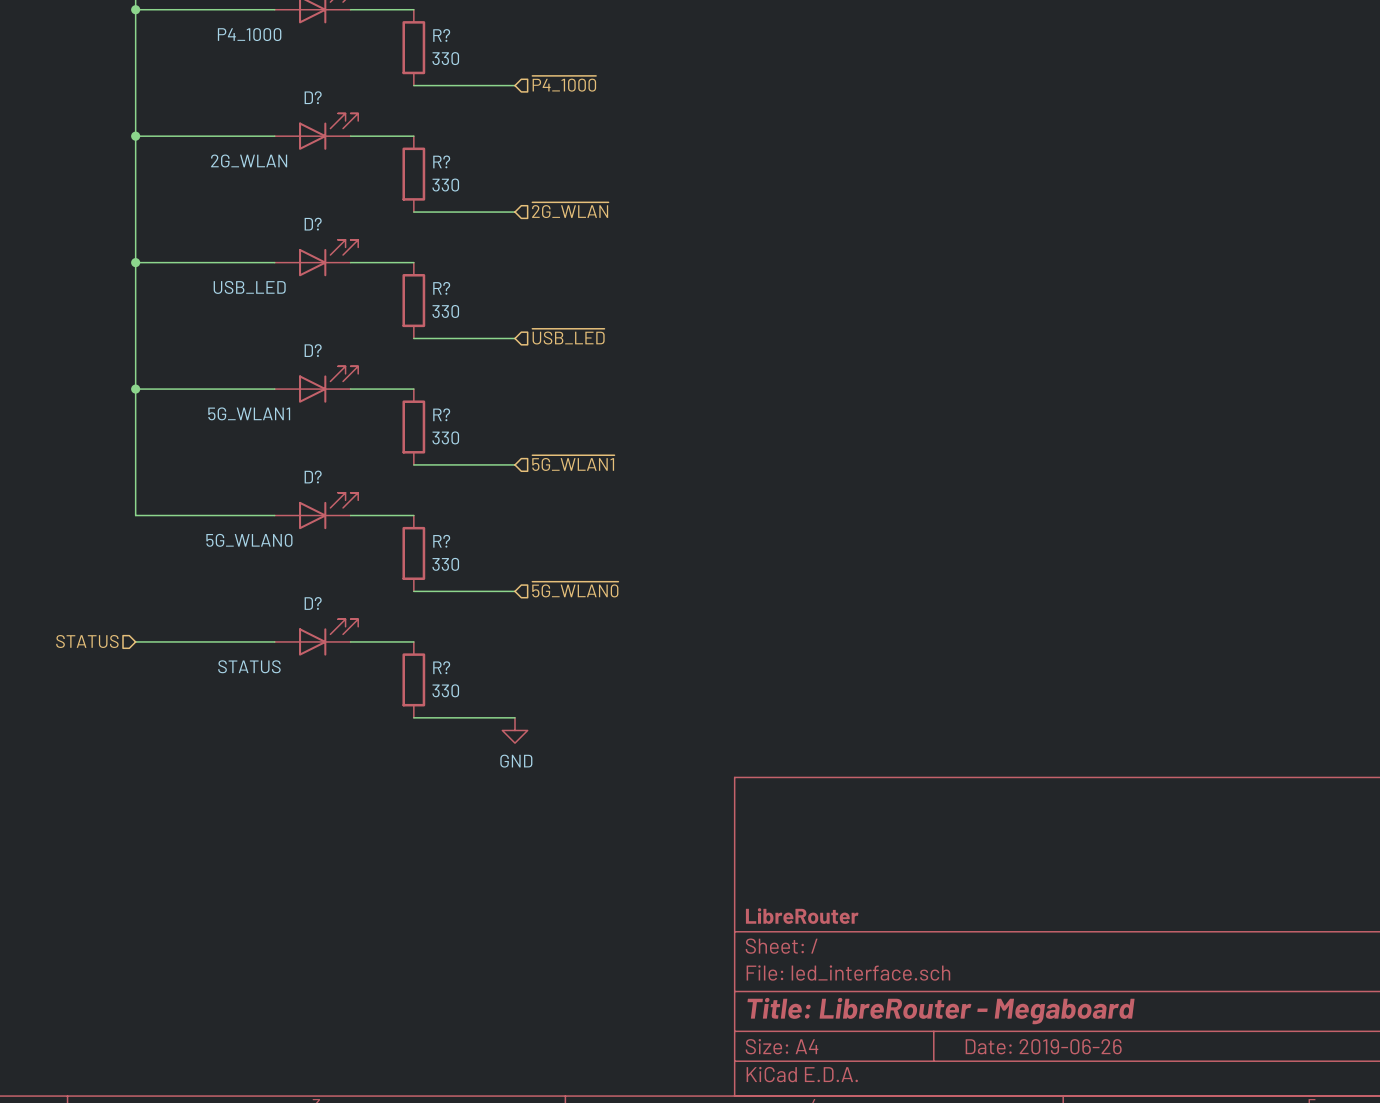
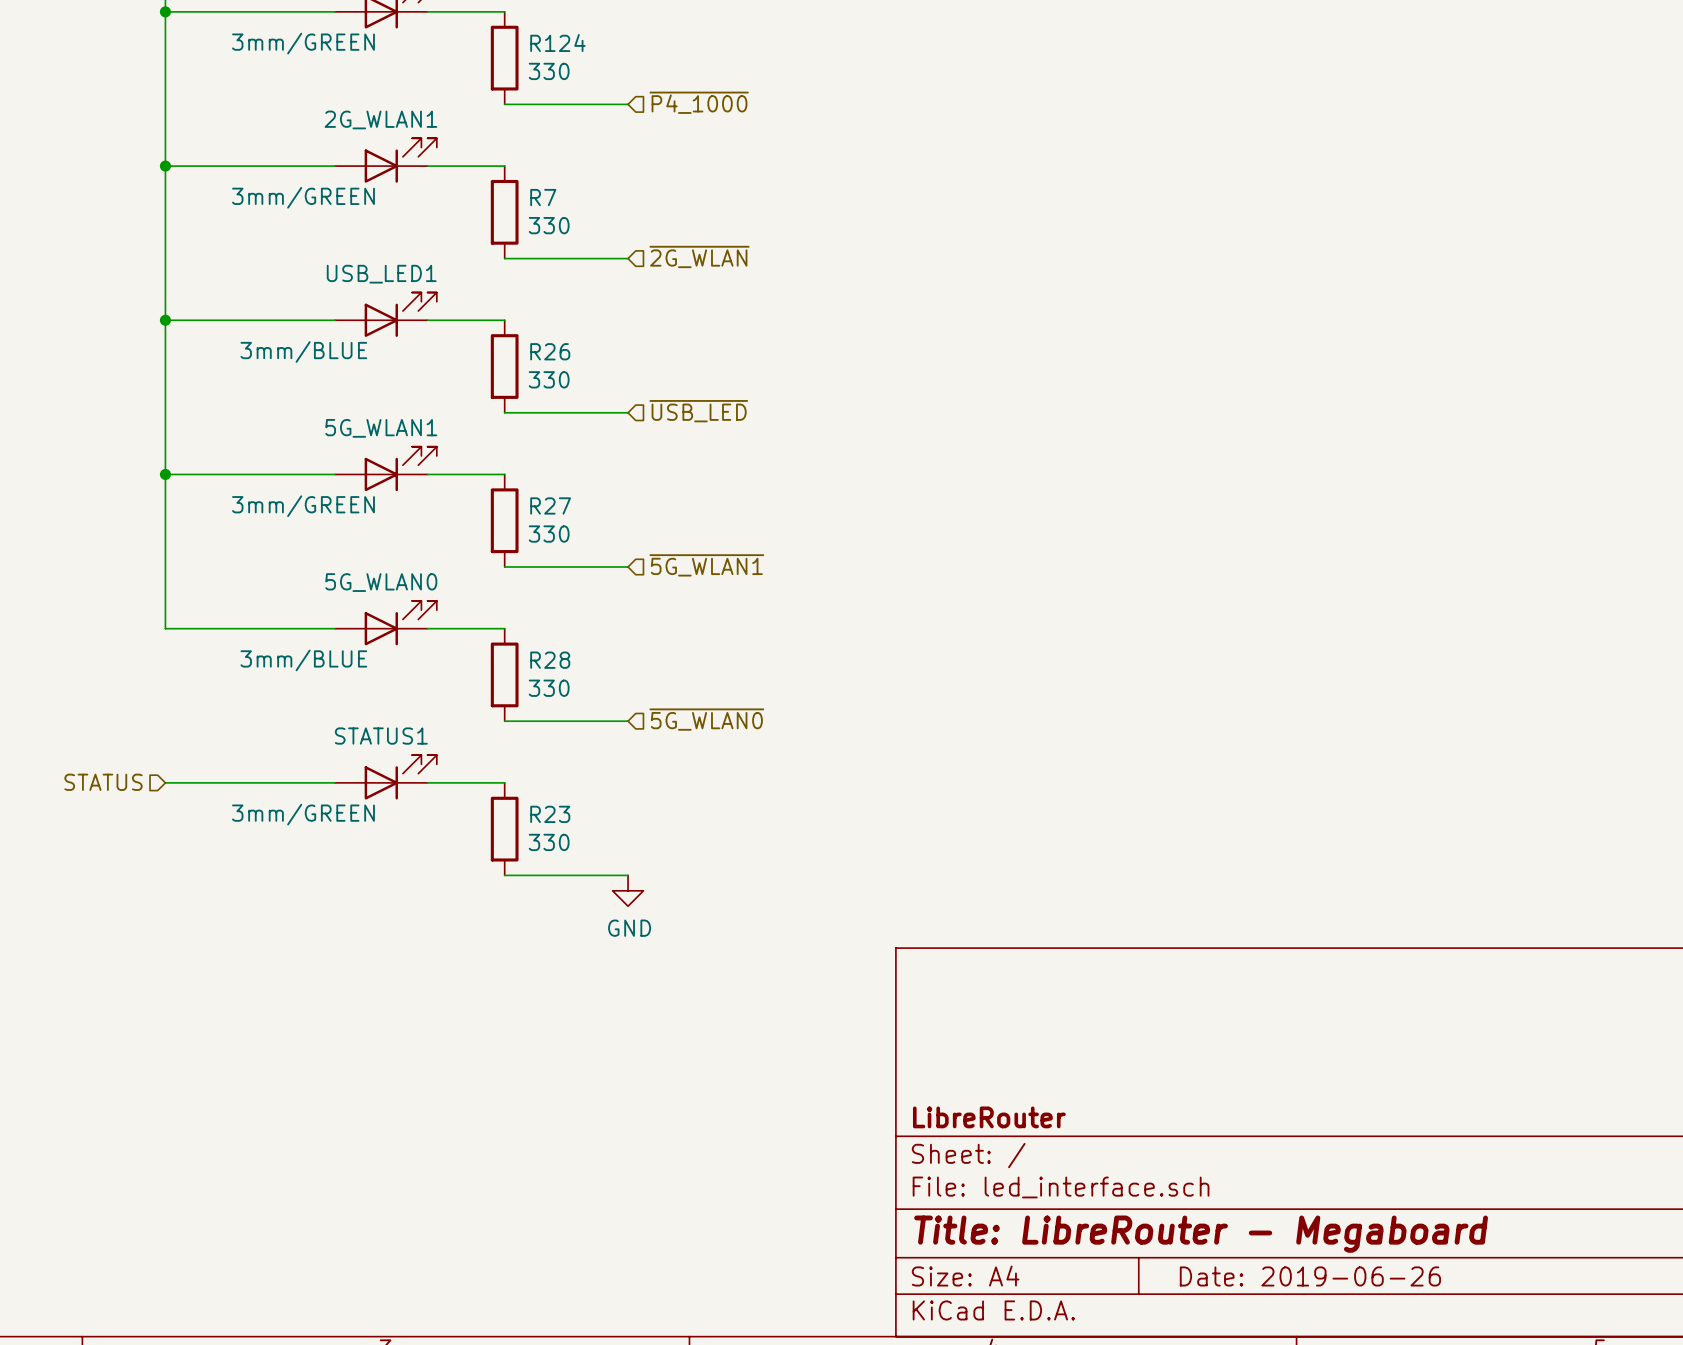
part value: P4_1000 (249, 34) -> 3mm/GREEN (303, 43)
R? name: R? (441, 35) -> R124 (557, 42)
D? name: D? (313, 97) -> 2G_WLAN1 (380, 119)
D? value: 2G_WLAN (249, 160) -> 3mm/GREEN (303, 197)
R? name: R? (441, 161) -> R7 (543, 197)
D? name: D? (313, 224) -> USB_LED1 (381, 274)
D? value: USB_LED (249, 287) -> 3mm/BLUE (303, 352)
R? name: R? (441, 288) -> R26 (550, 351)
D? name: D? (313, 350) -> 5G_WLAN1 (381, 428)
D? value: 5G_WLAN1 (249, 413) -> 3mm/GREEN (303, 506)
R? name: R? (441, 414) -> R27 (550, 505)
D? name: D? (313, 477) -> 5G_WLAN0 (381, 582)
D? value: 5G_WLAN0 (249, 540) -> 3mm/BLUE (303, 660)
R? name: R? (441, 541) -> R28 (550, 660)
D? name: D? (313, 603) -> STATUS1 (381, 736)
D? value: STATUS (249, 666) -> 3mm/GREEN (303, 814)
R? name: R? (441, 667) -> R23 (550, 814)

